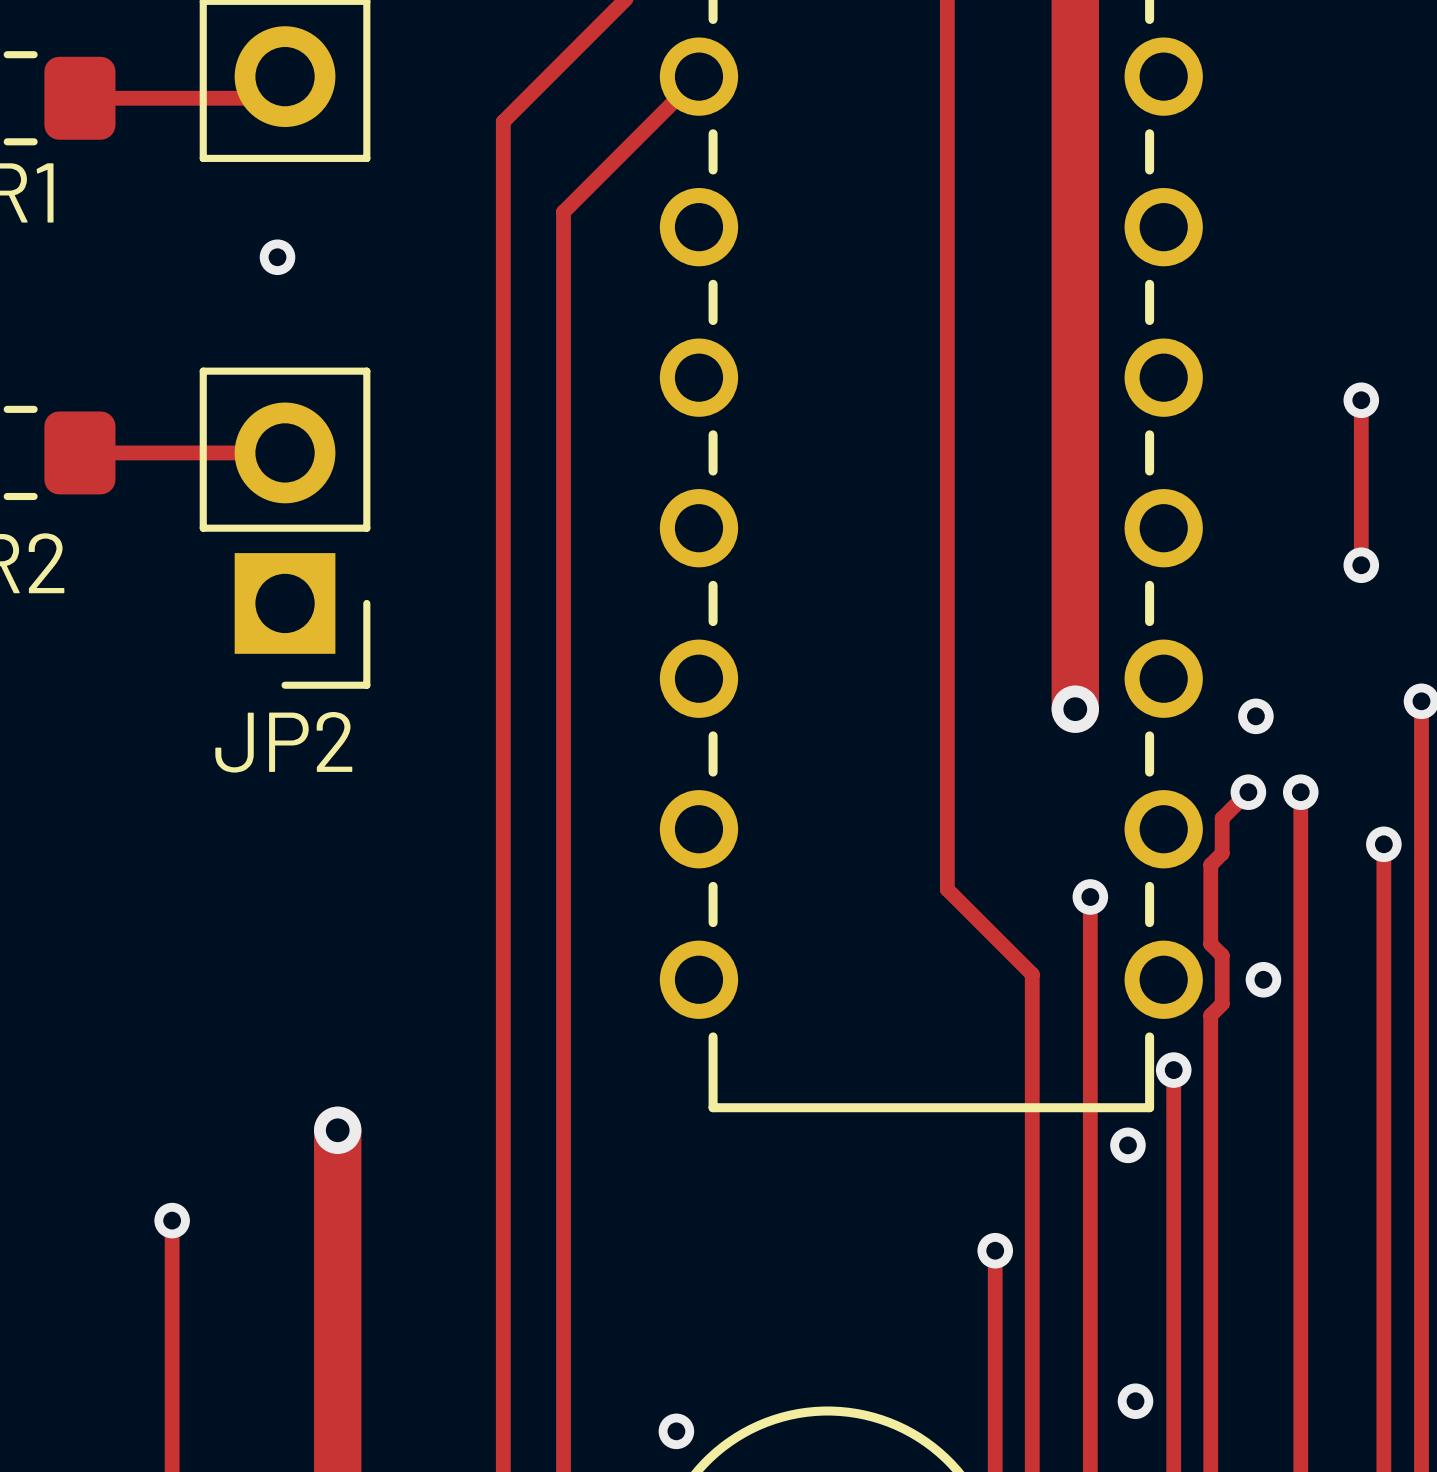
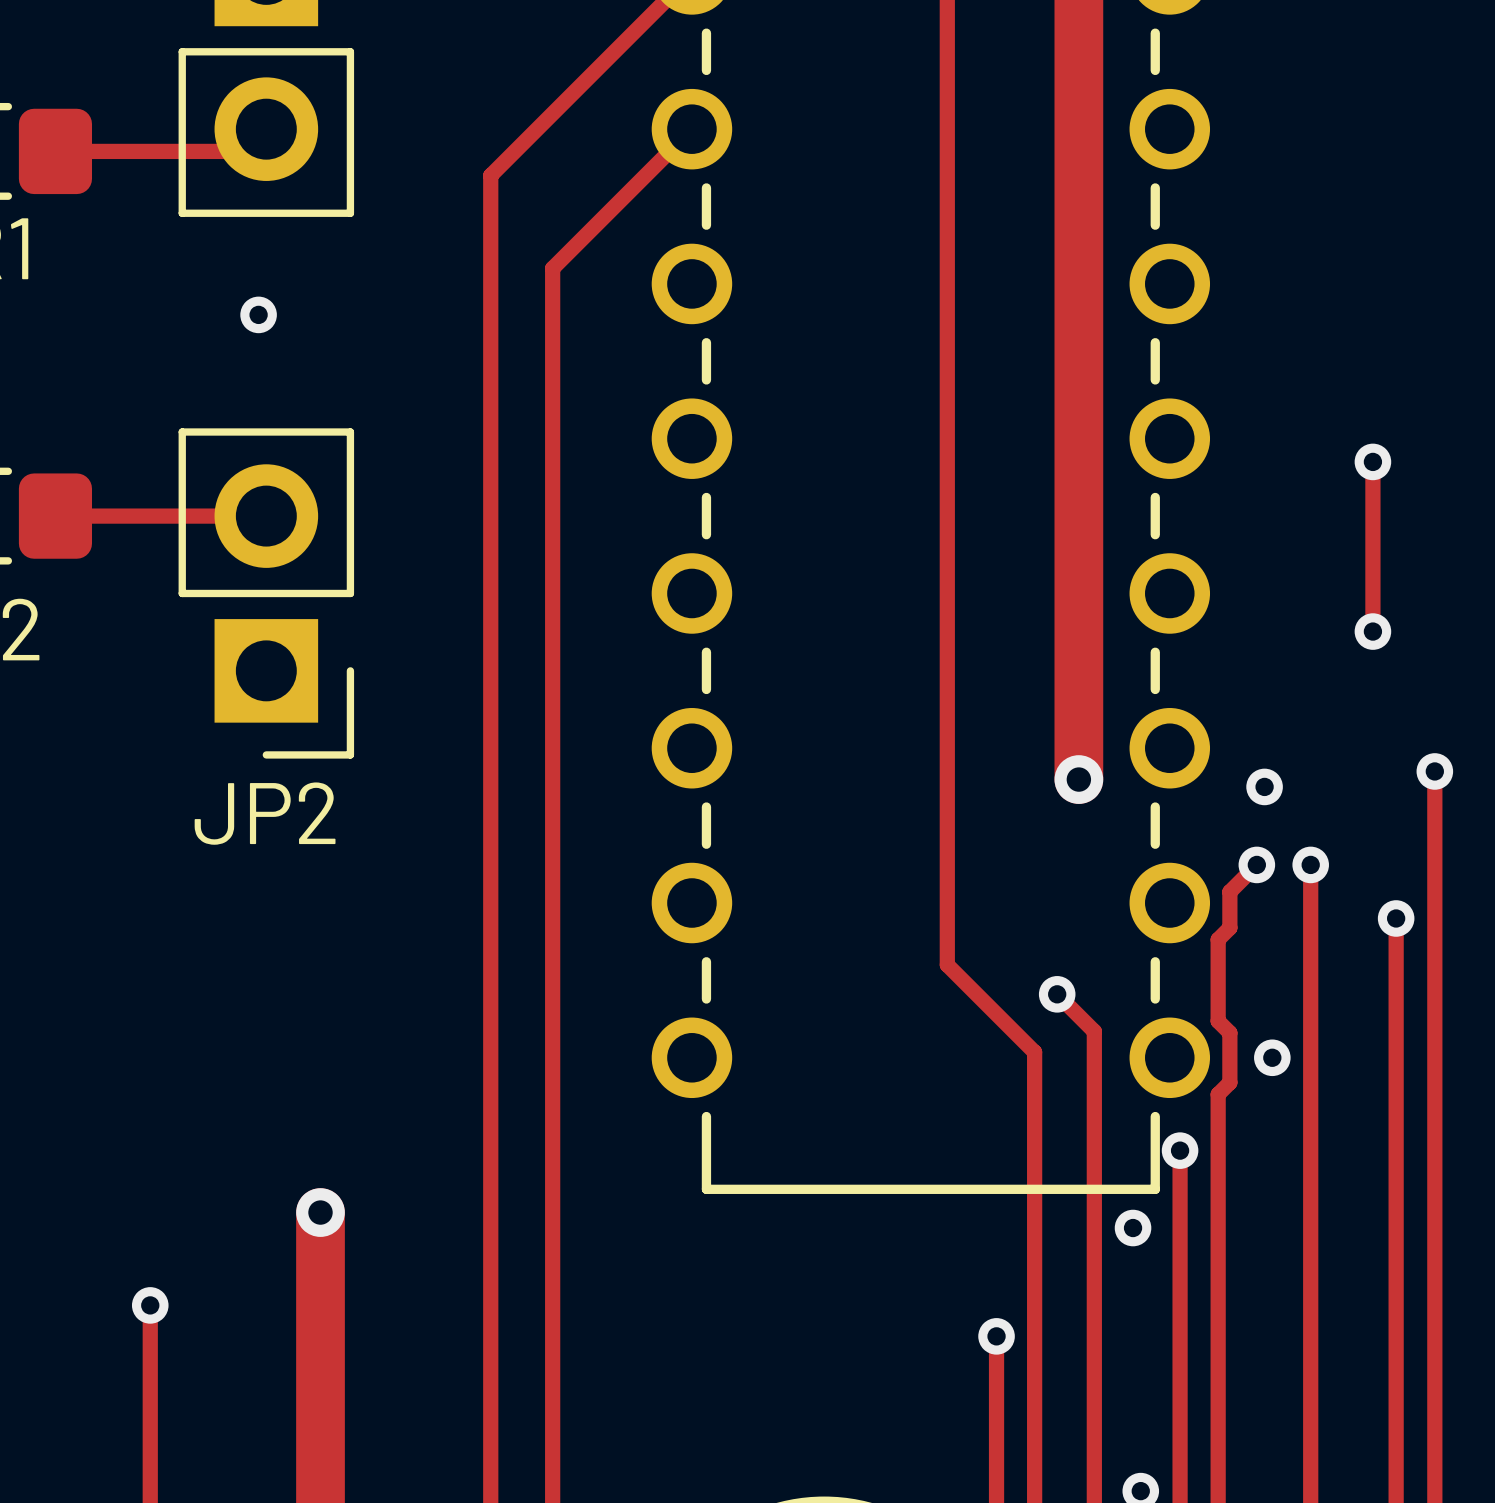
track: (1090, 896) (1090, 954) -> (1057, 994) (1094, 1031)
via position: (1090, 896) -> (1057, 994)

